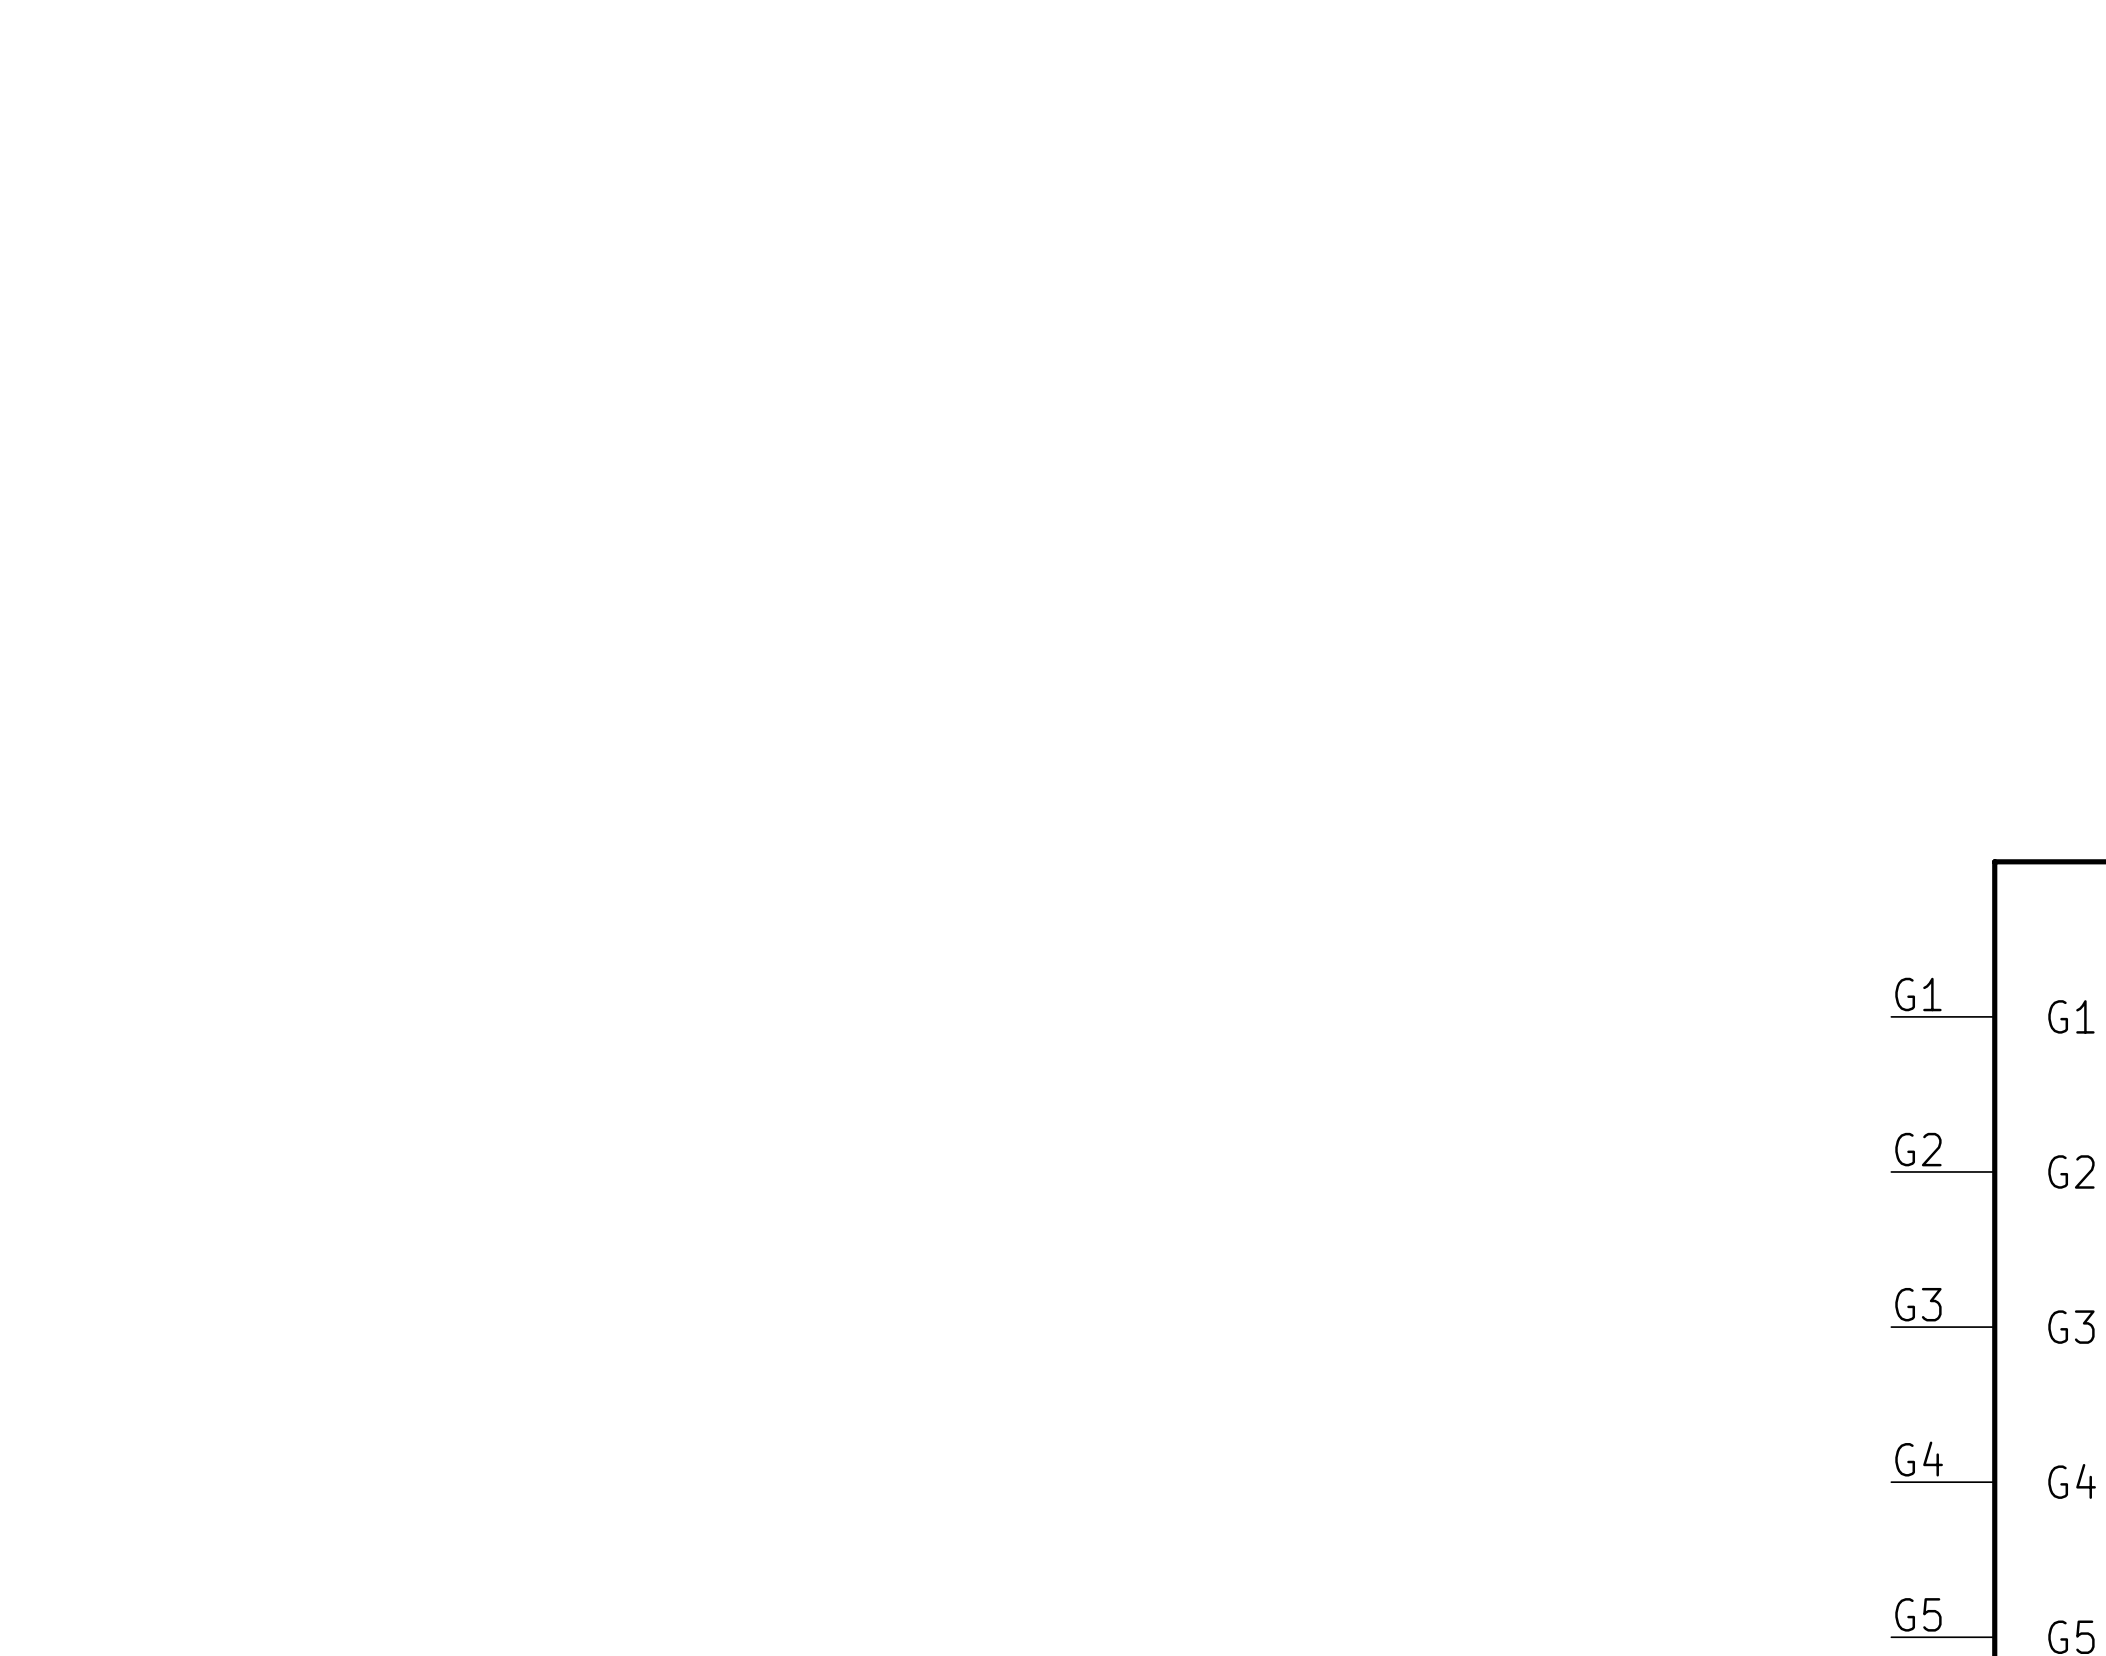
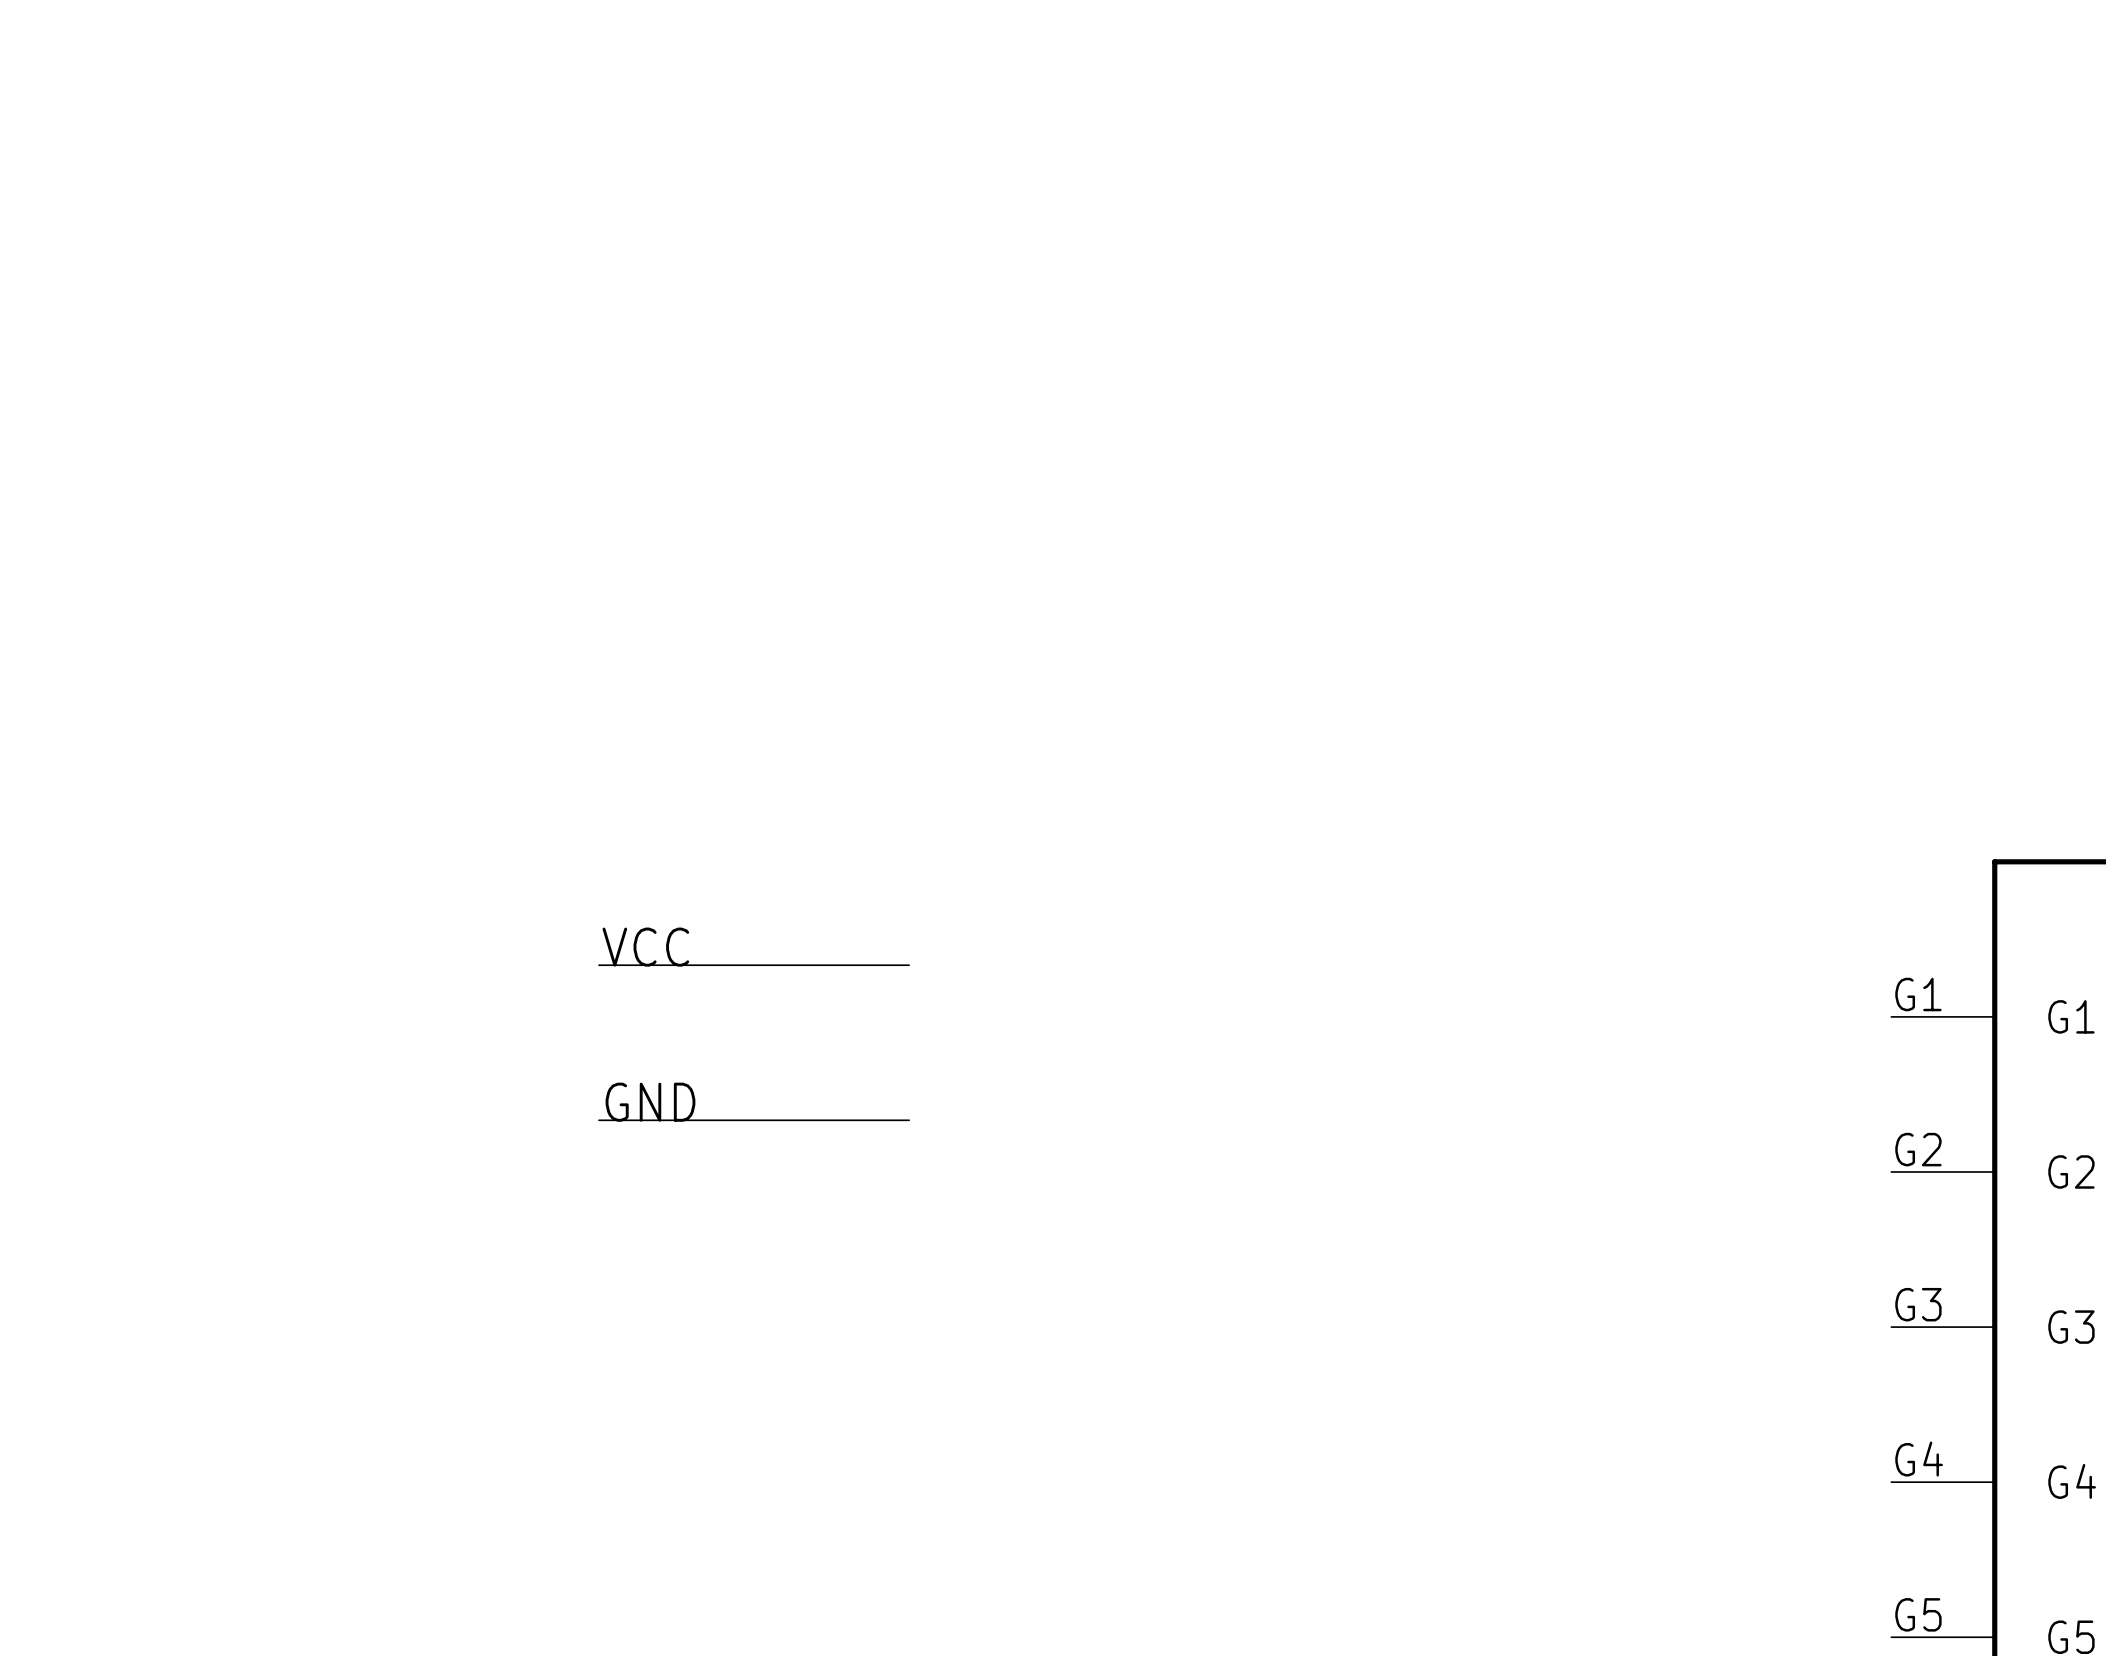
label: none -> VCC (645, 947)
wire: none -> (598, 965) (909, 965)
label: none -> GND (650, 1102)
wire: none -> (598, 1120) (909, 1120)

